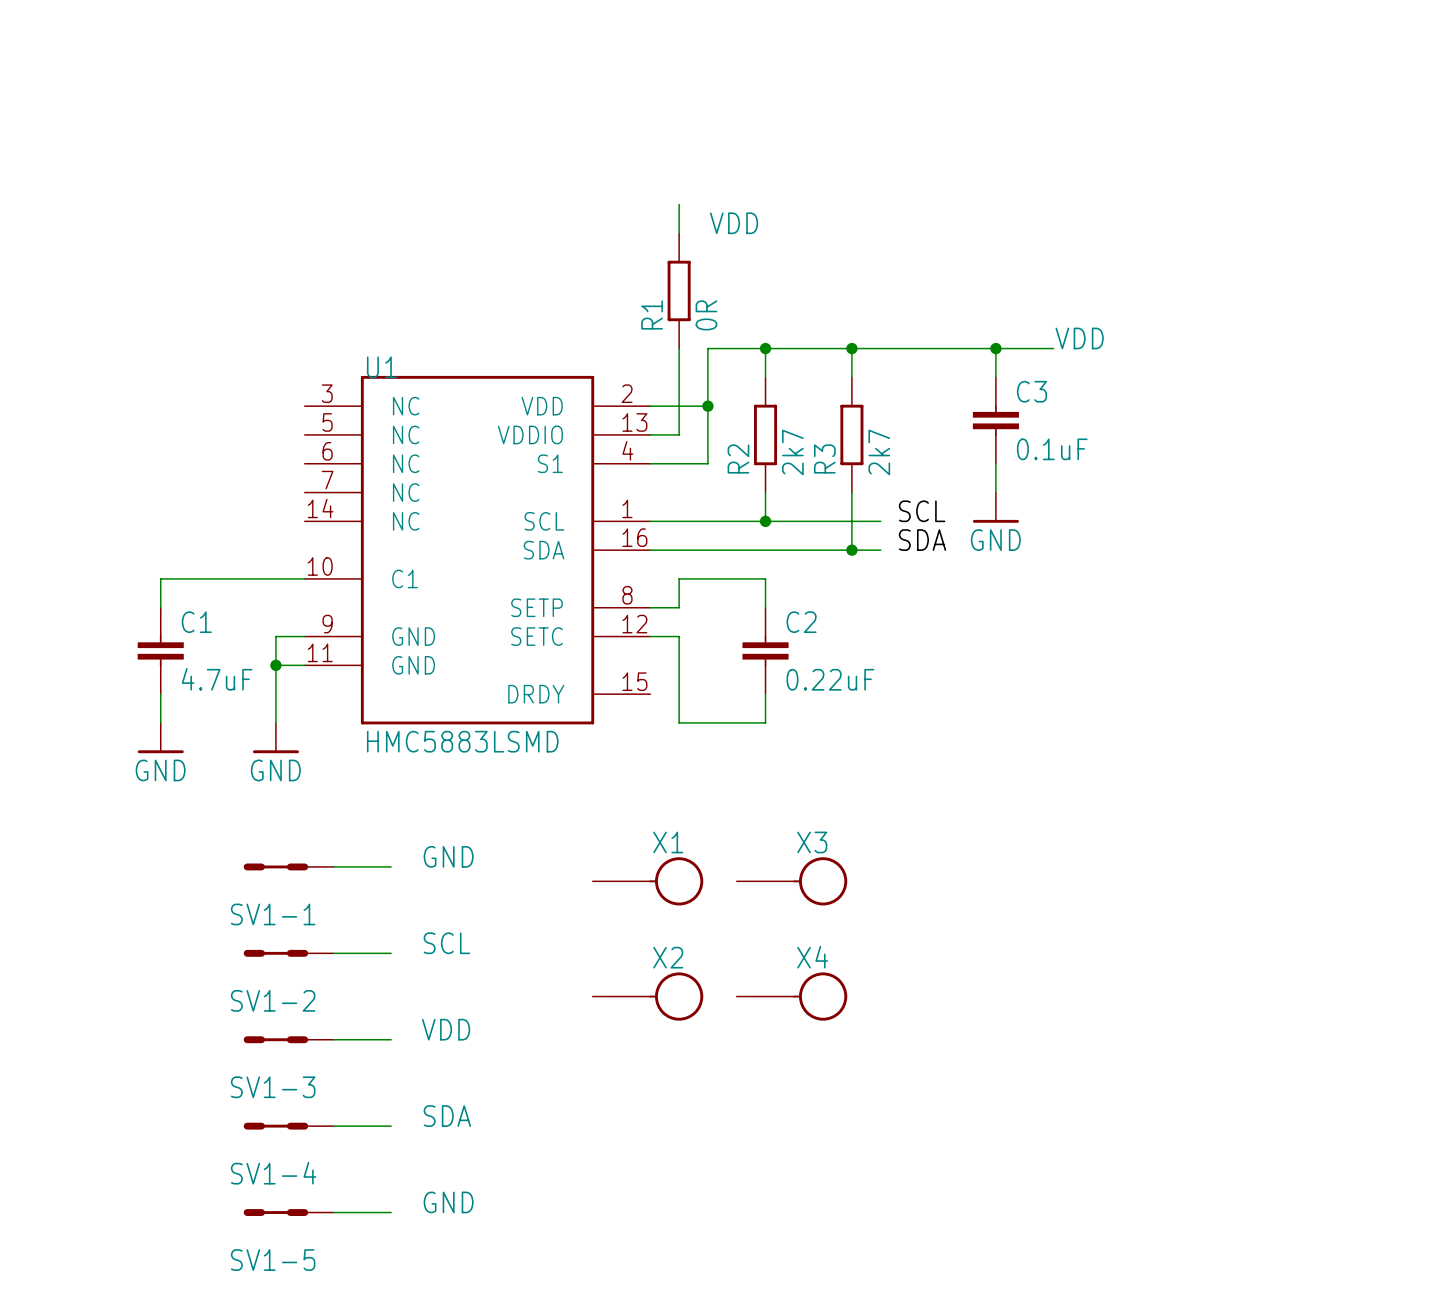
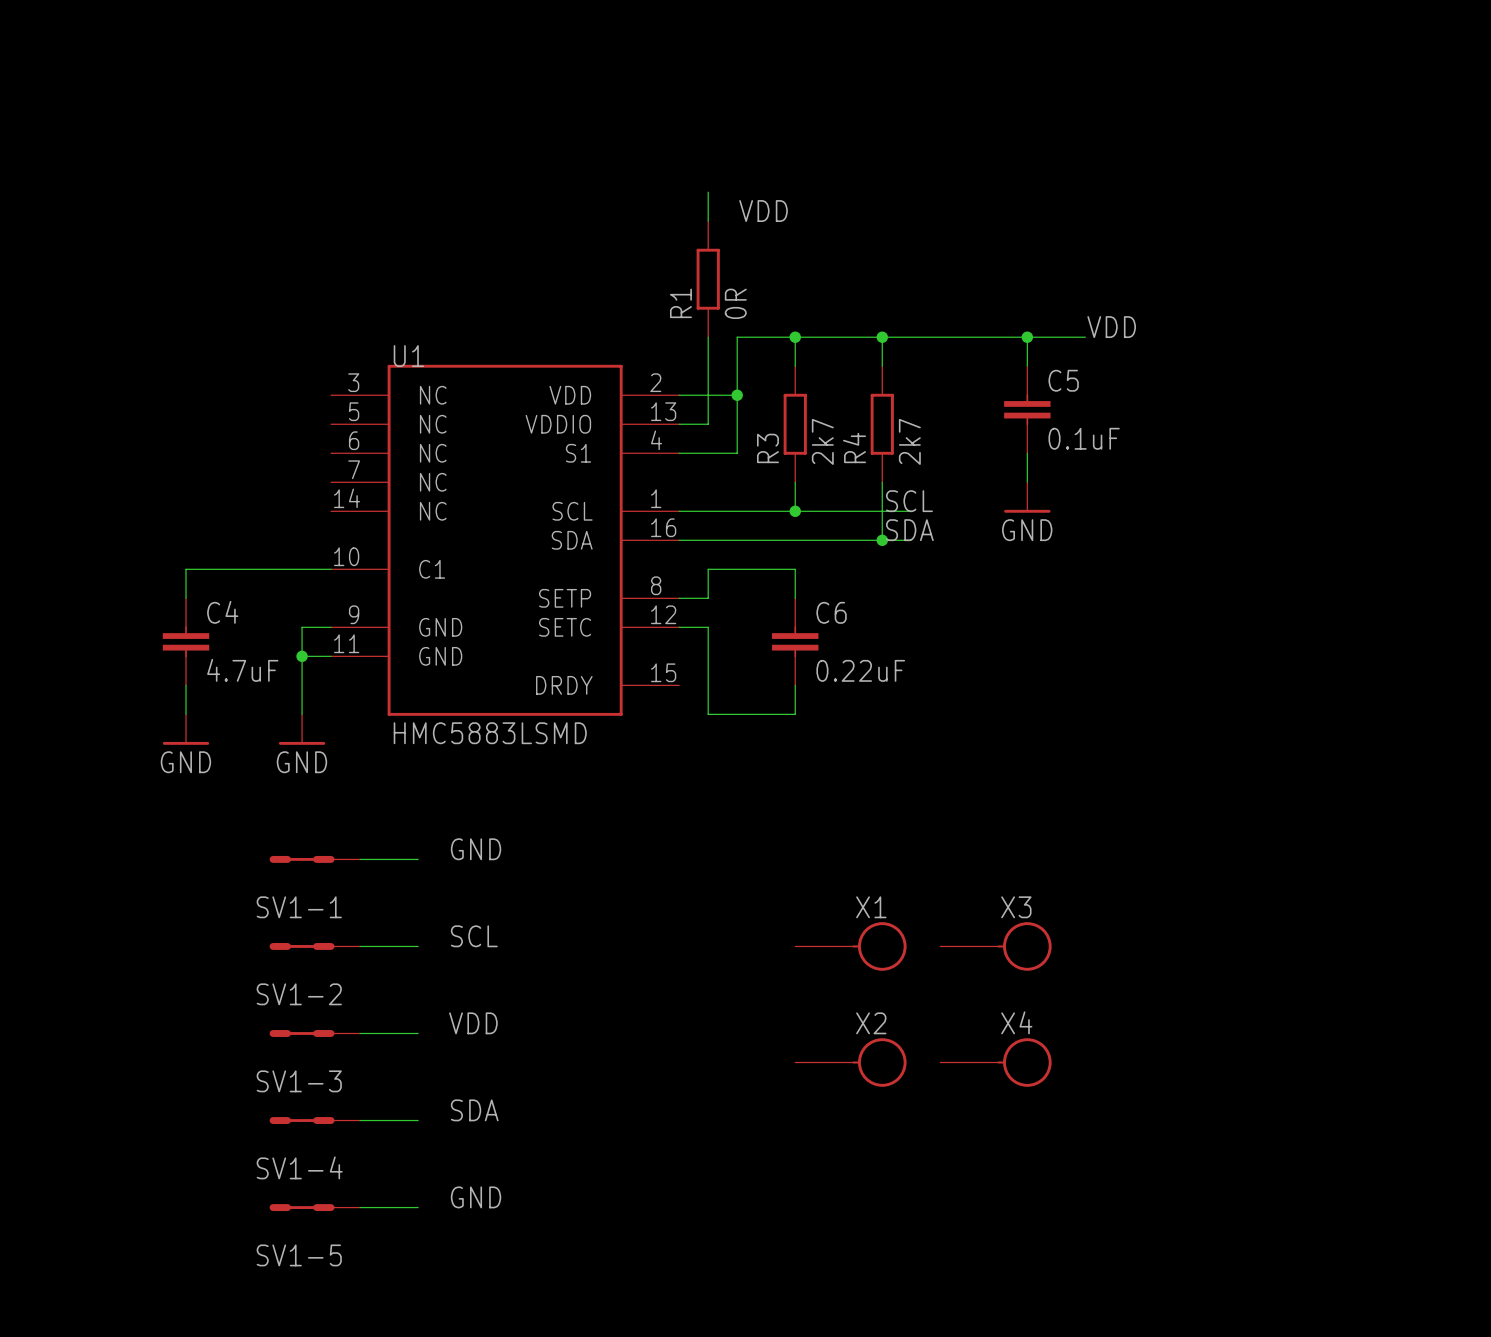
C3 name: C3 (1031, 391) -> C5 (1063, 380)
R2 name: R2 (738, 458) -> R3 (767, 448)
R3 name: R3 (824, 458) -> R4 (854, 448)
label position: SCL (922, 511) -> SCL (909, 501)
label position: SDA (922, 540) -> SDA (909, 530)
C1 name: C1 (196, 622) -> C4 (222, 612)
C2 name: C2 (801, 622) -> C6 (831, 612)
X1 position: (647, 881) -> (850, 946)
X3 position: (791, 881) -> (995, 946)
X2 position: (647, 996) -> (850, 1062)
X4 position: (791, 996) -> (995, 1062)

